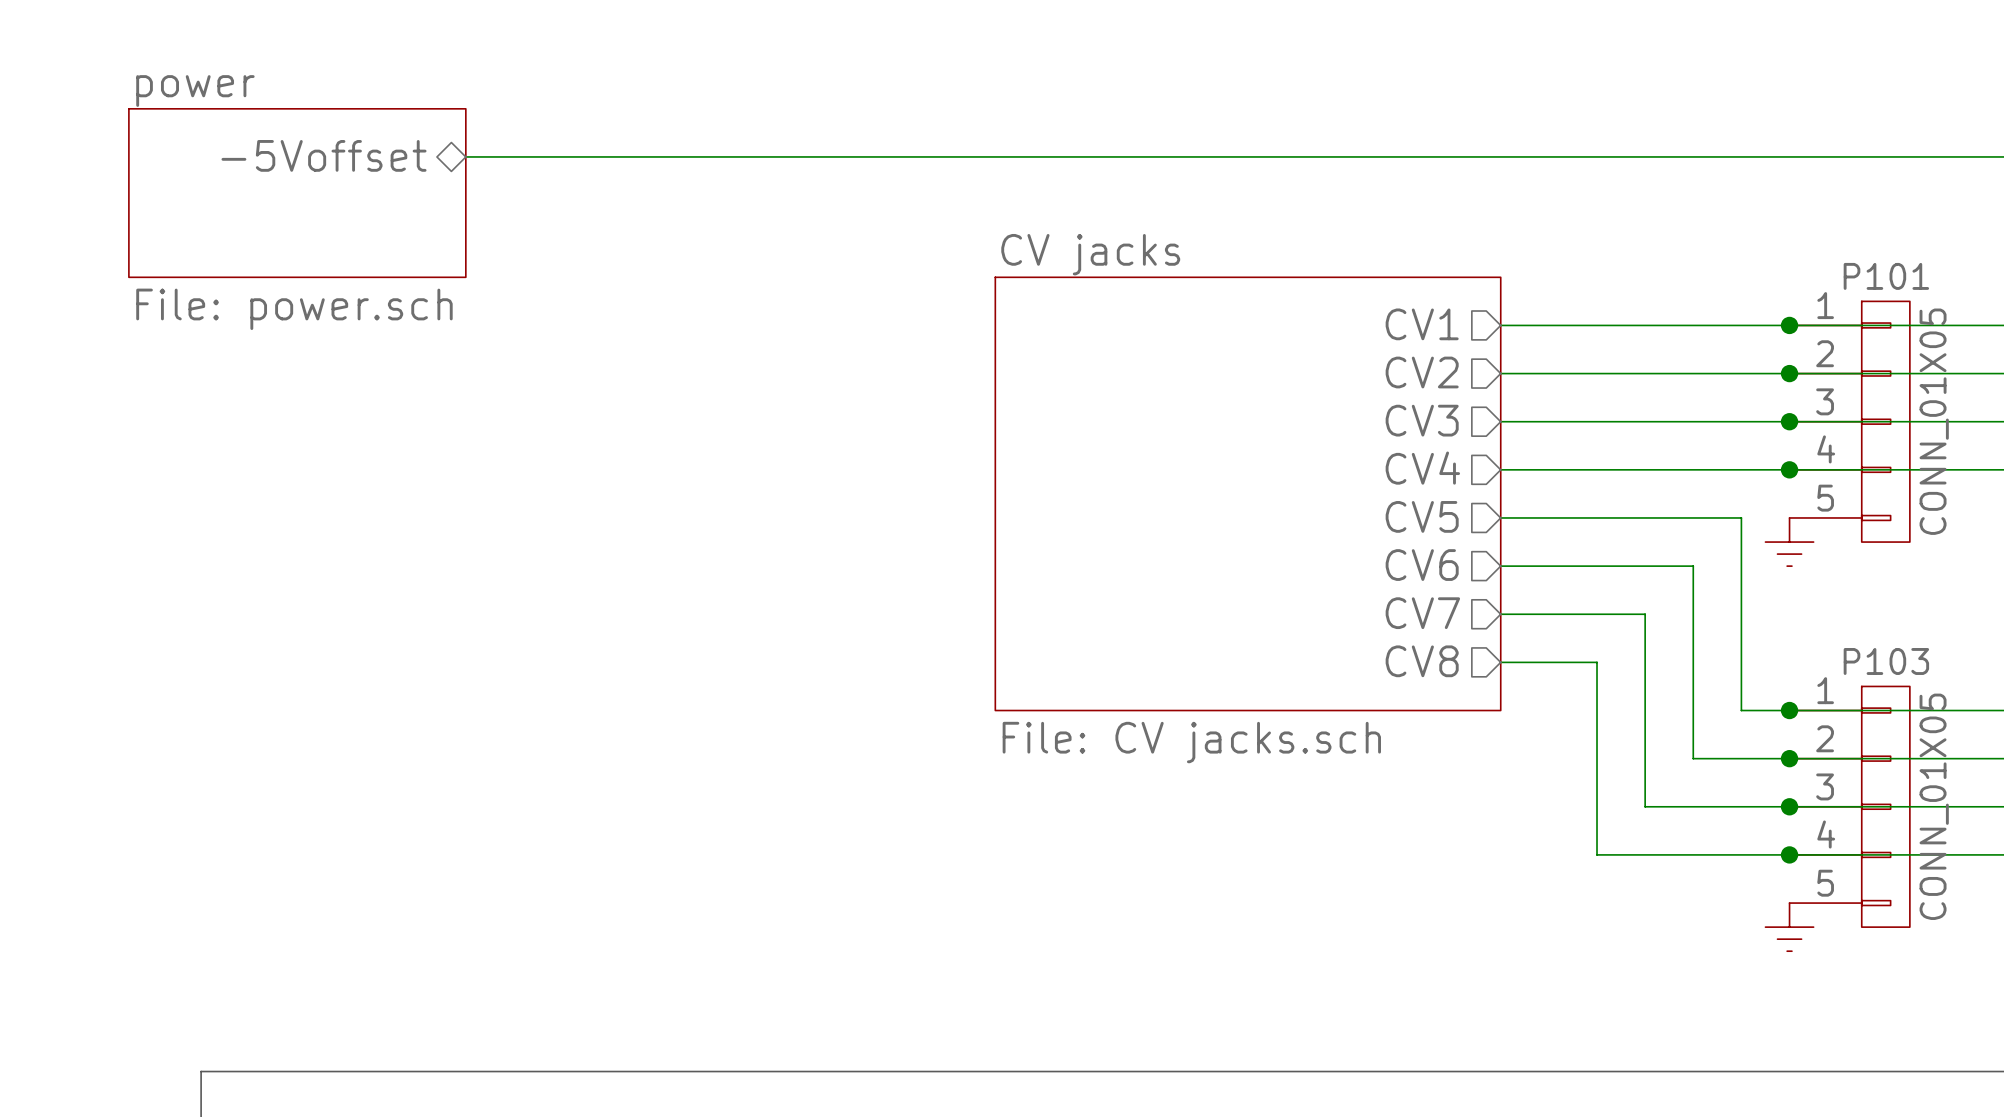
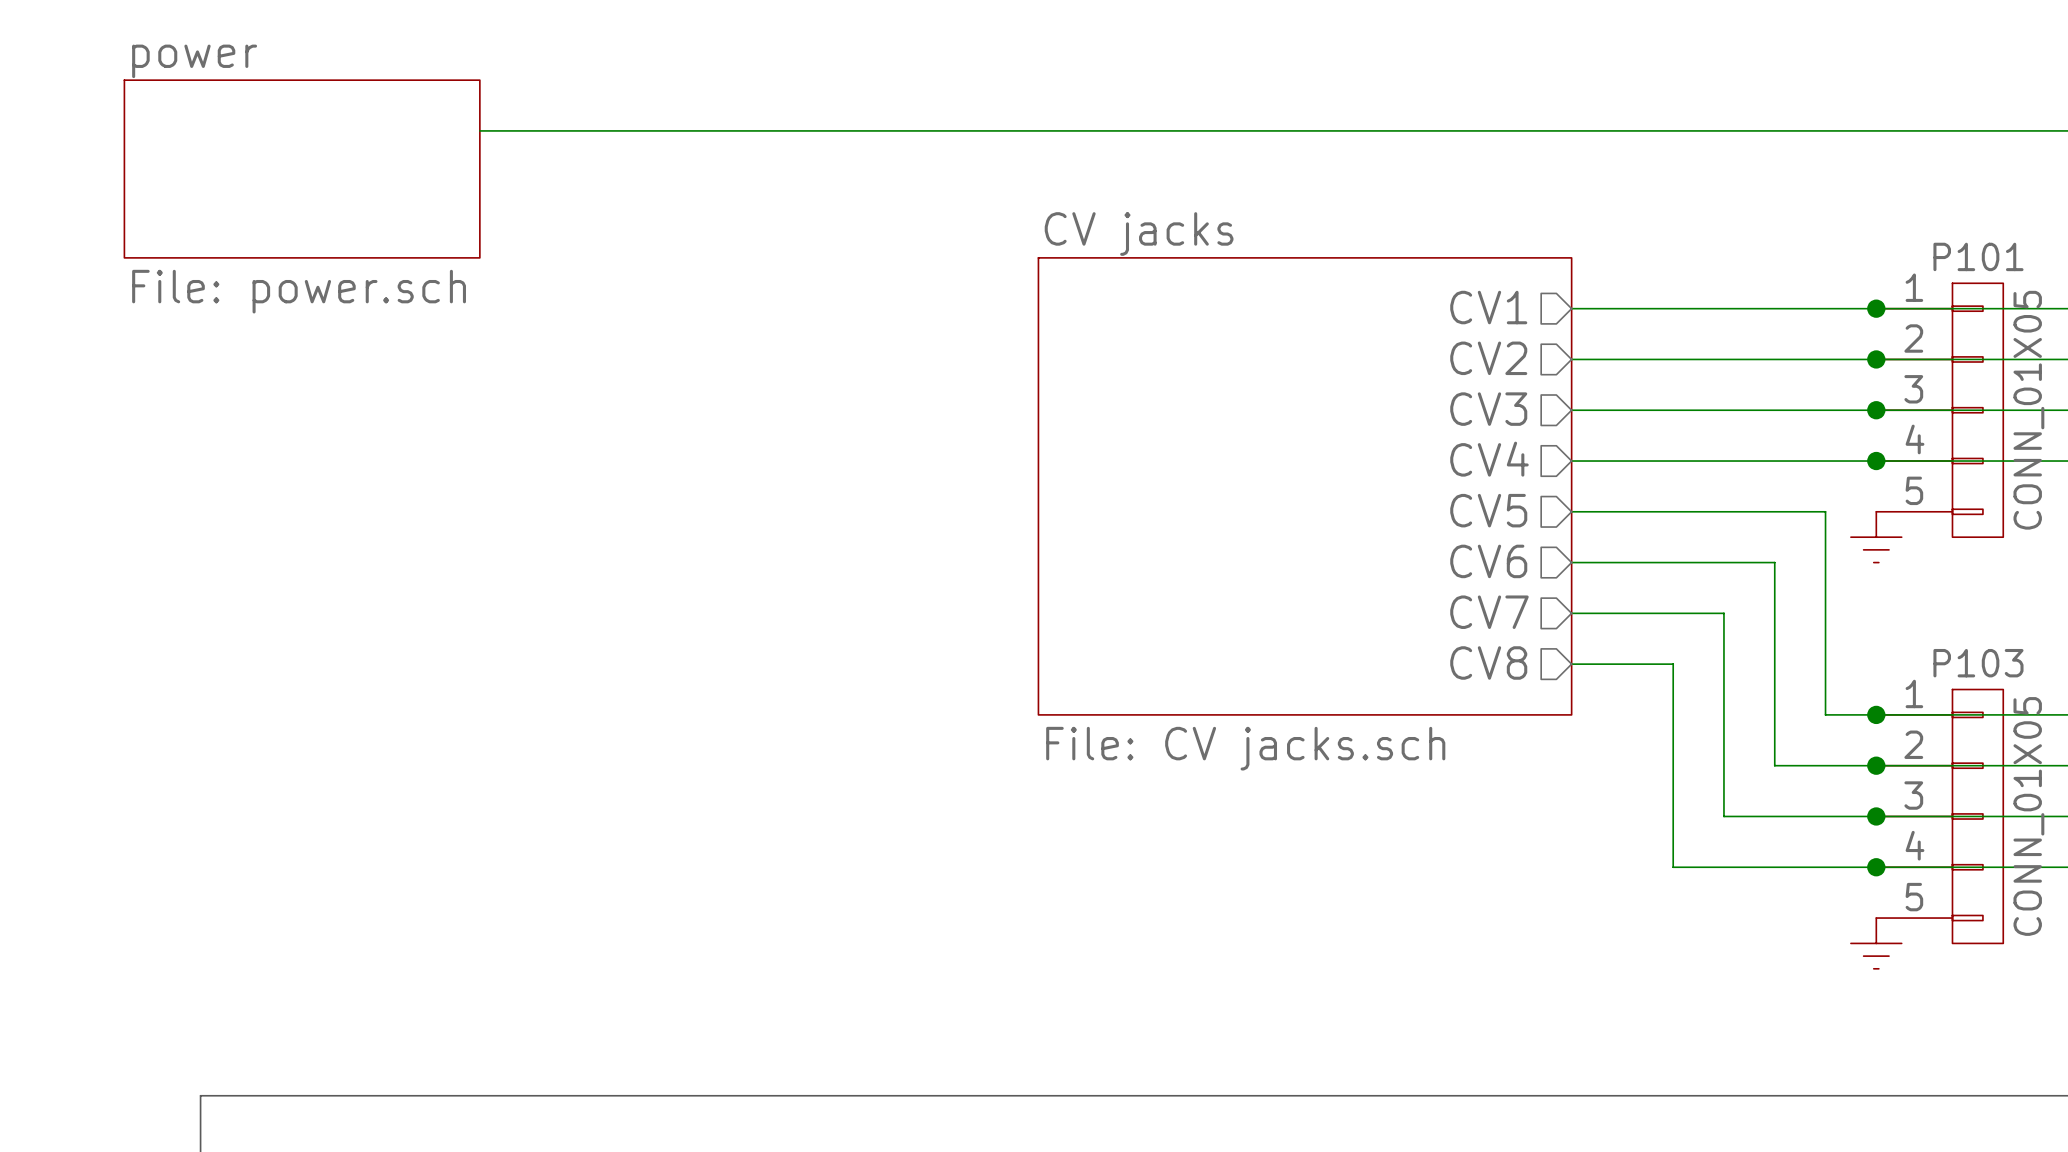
sheet pin: -5Voffset (324, 155) -> none

